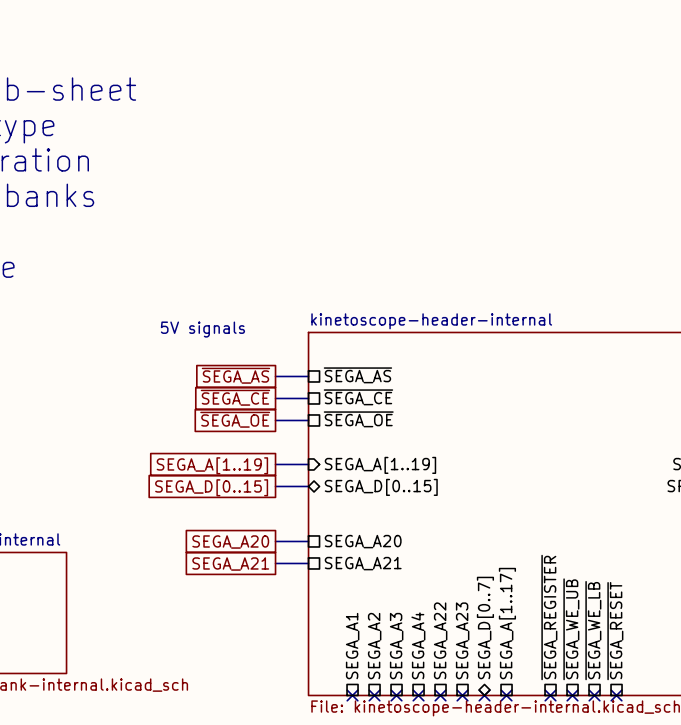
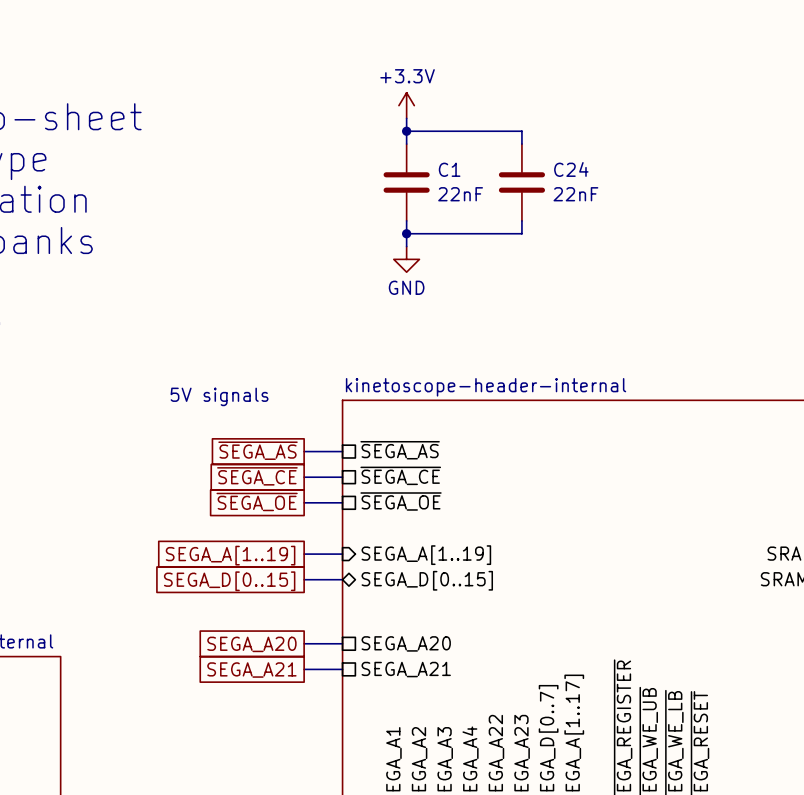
power symbol: none -> +3.3V (406, 105)
wire: none -> (406, 118) (406, 144)
wire: none -> (406, 131) (521, 131) (521, 144)
junction: none -> (406, 131)
C1: none -> 22nF (406, 182)
C24: none -> 22nF (521, 182)
wire: none -> (406, 220) (406, 246)
wire: none -> (521, 220) (521, 233) (406, 233)
junction: none -> (406, 233)
power symbol: none -> GND (406, 259)

